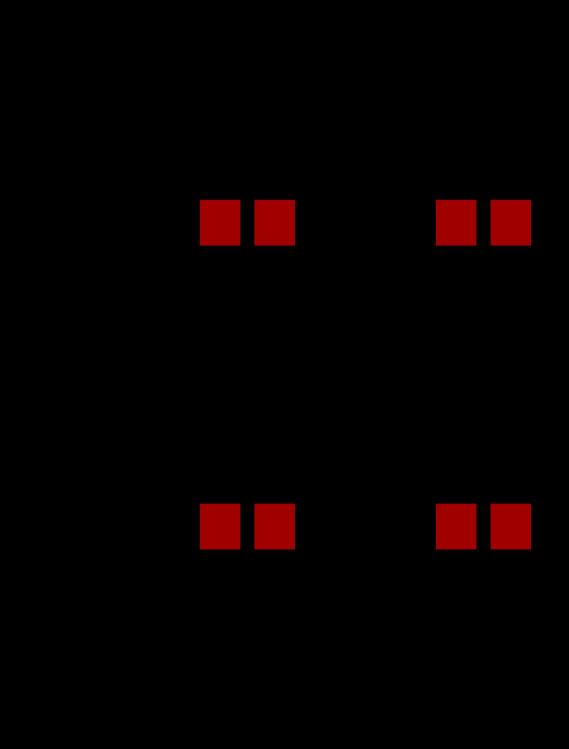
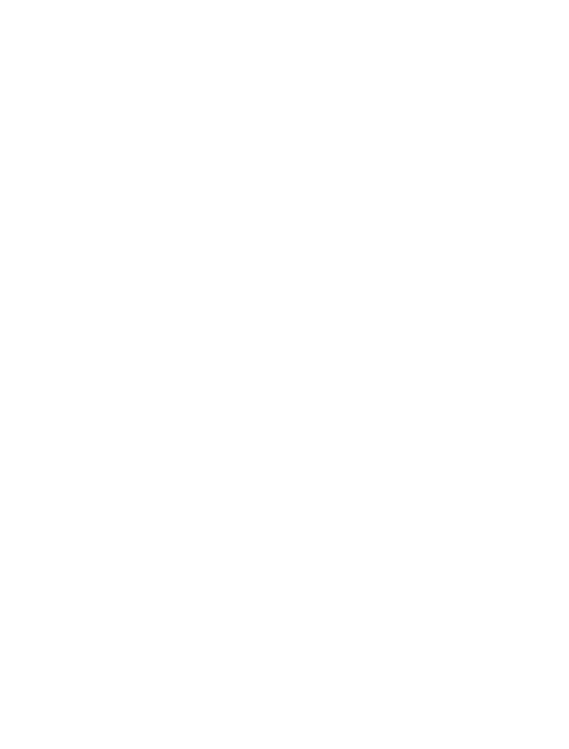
part: (247, 222) -> none
part: (483, 222) -> none
part: (247, 526) -> none
part: (483, 526) -> none

